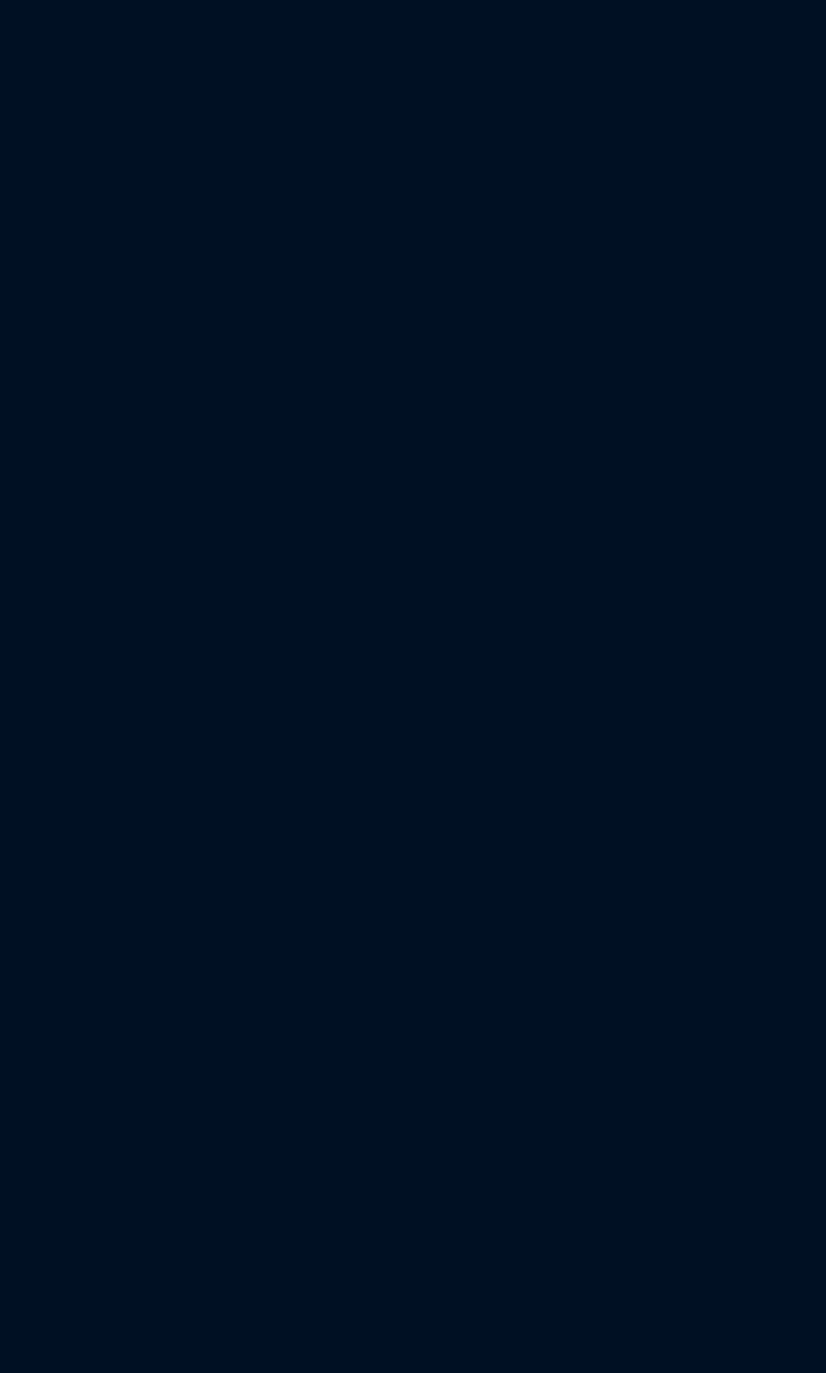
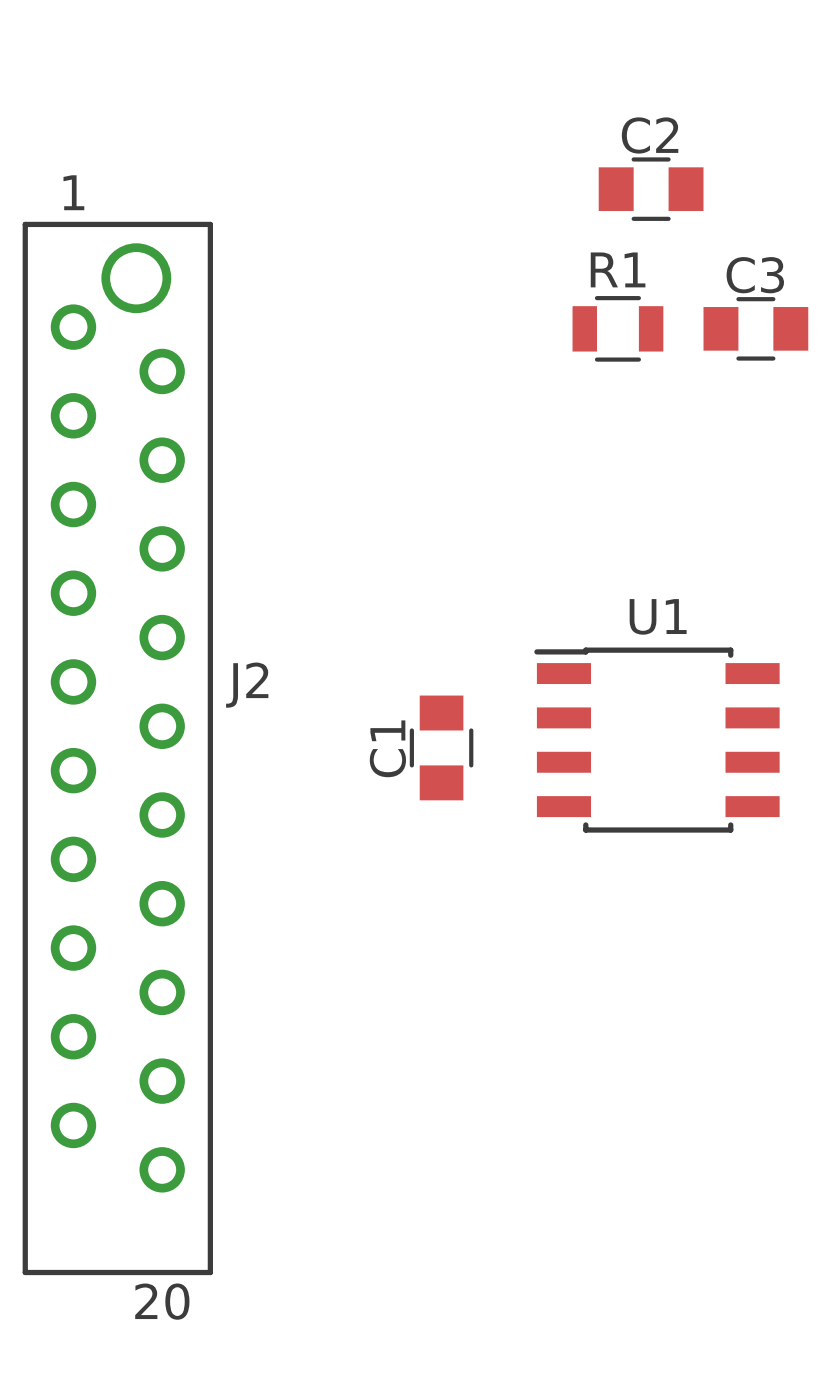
C2: none -> (651, 189)
R1: none -> (617, 328)
C3: none -> (755, 328)
U1: none -> (656, 740)
C1: none -> (441, 747)
J2: none -> (117, 748)

